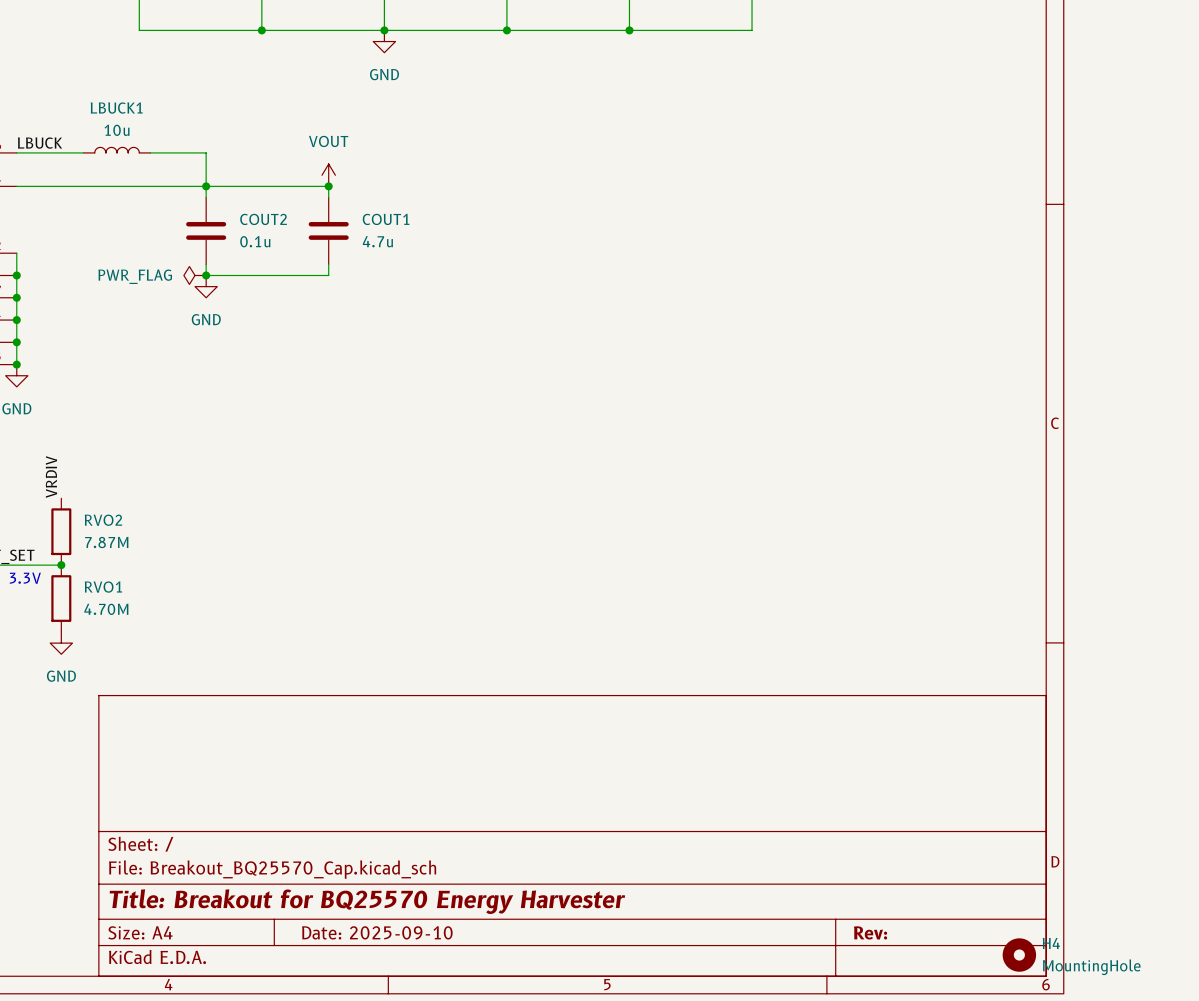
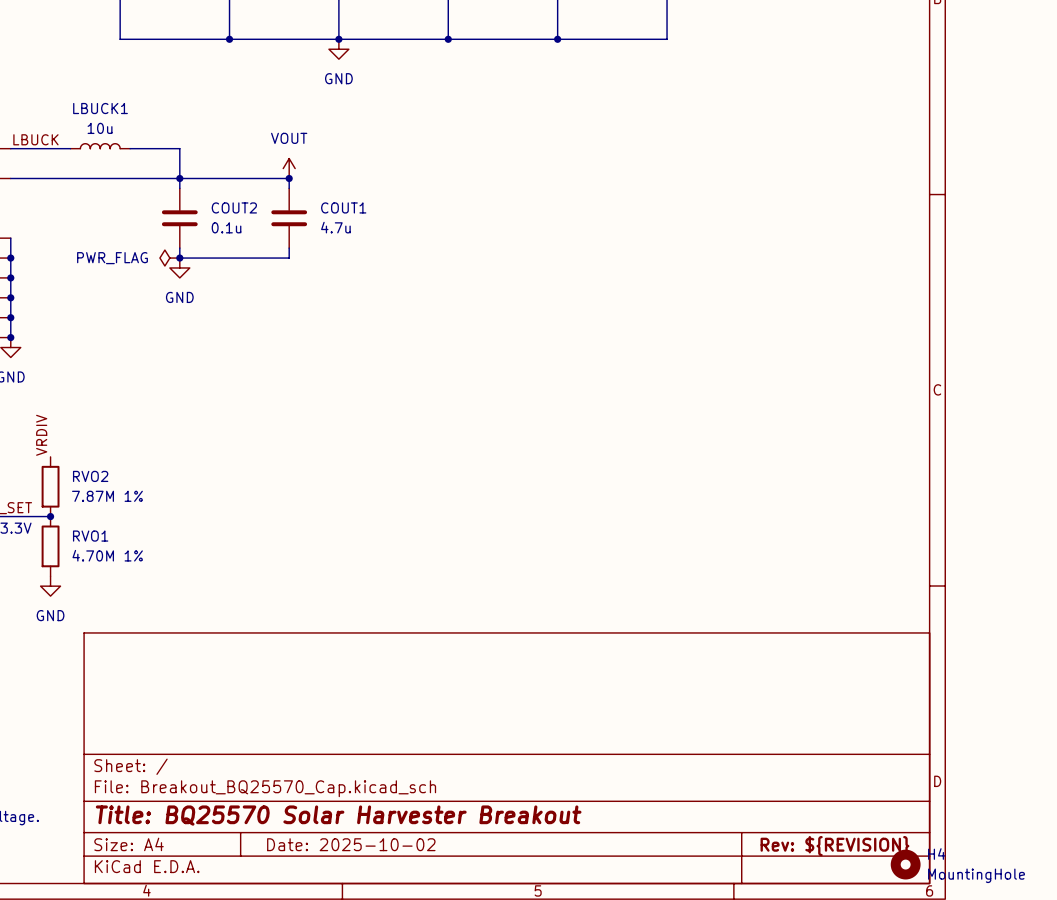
RVO2 value: 7.87M (106, 542) -> 7.87M 1% (107, 496)
RVO1 value: 4.70M (106, 609) -> 4.70M 1% (107, 555)
title block: Title: Breakout for BQ25570 Energy Harvester (367, 901) -> Title: BQ25570 Solar Harvester Breakout (338, 815)
title block: Date: 2025-09-10 (377, 932) -> Date: 2025-10-02 (351, 844)
title block: Rev: (870, 932) -> Rev: ${REVISION} (834, 846)

